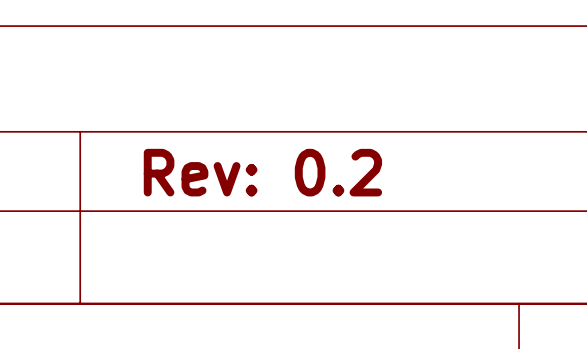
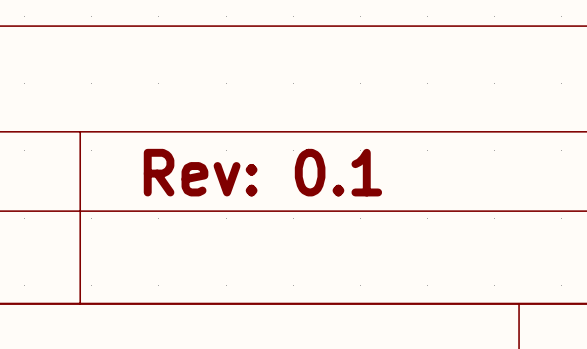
title block: Rev: 0.2 (262, 172) -> Rev: 0.1 (262, 172)

